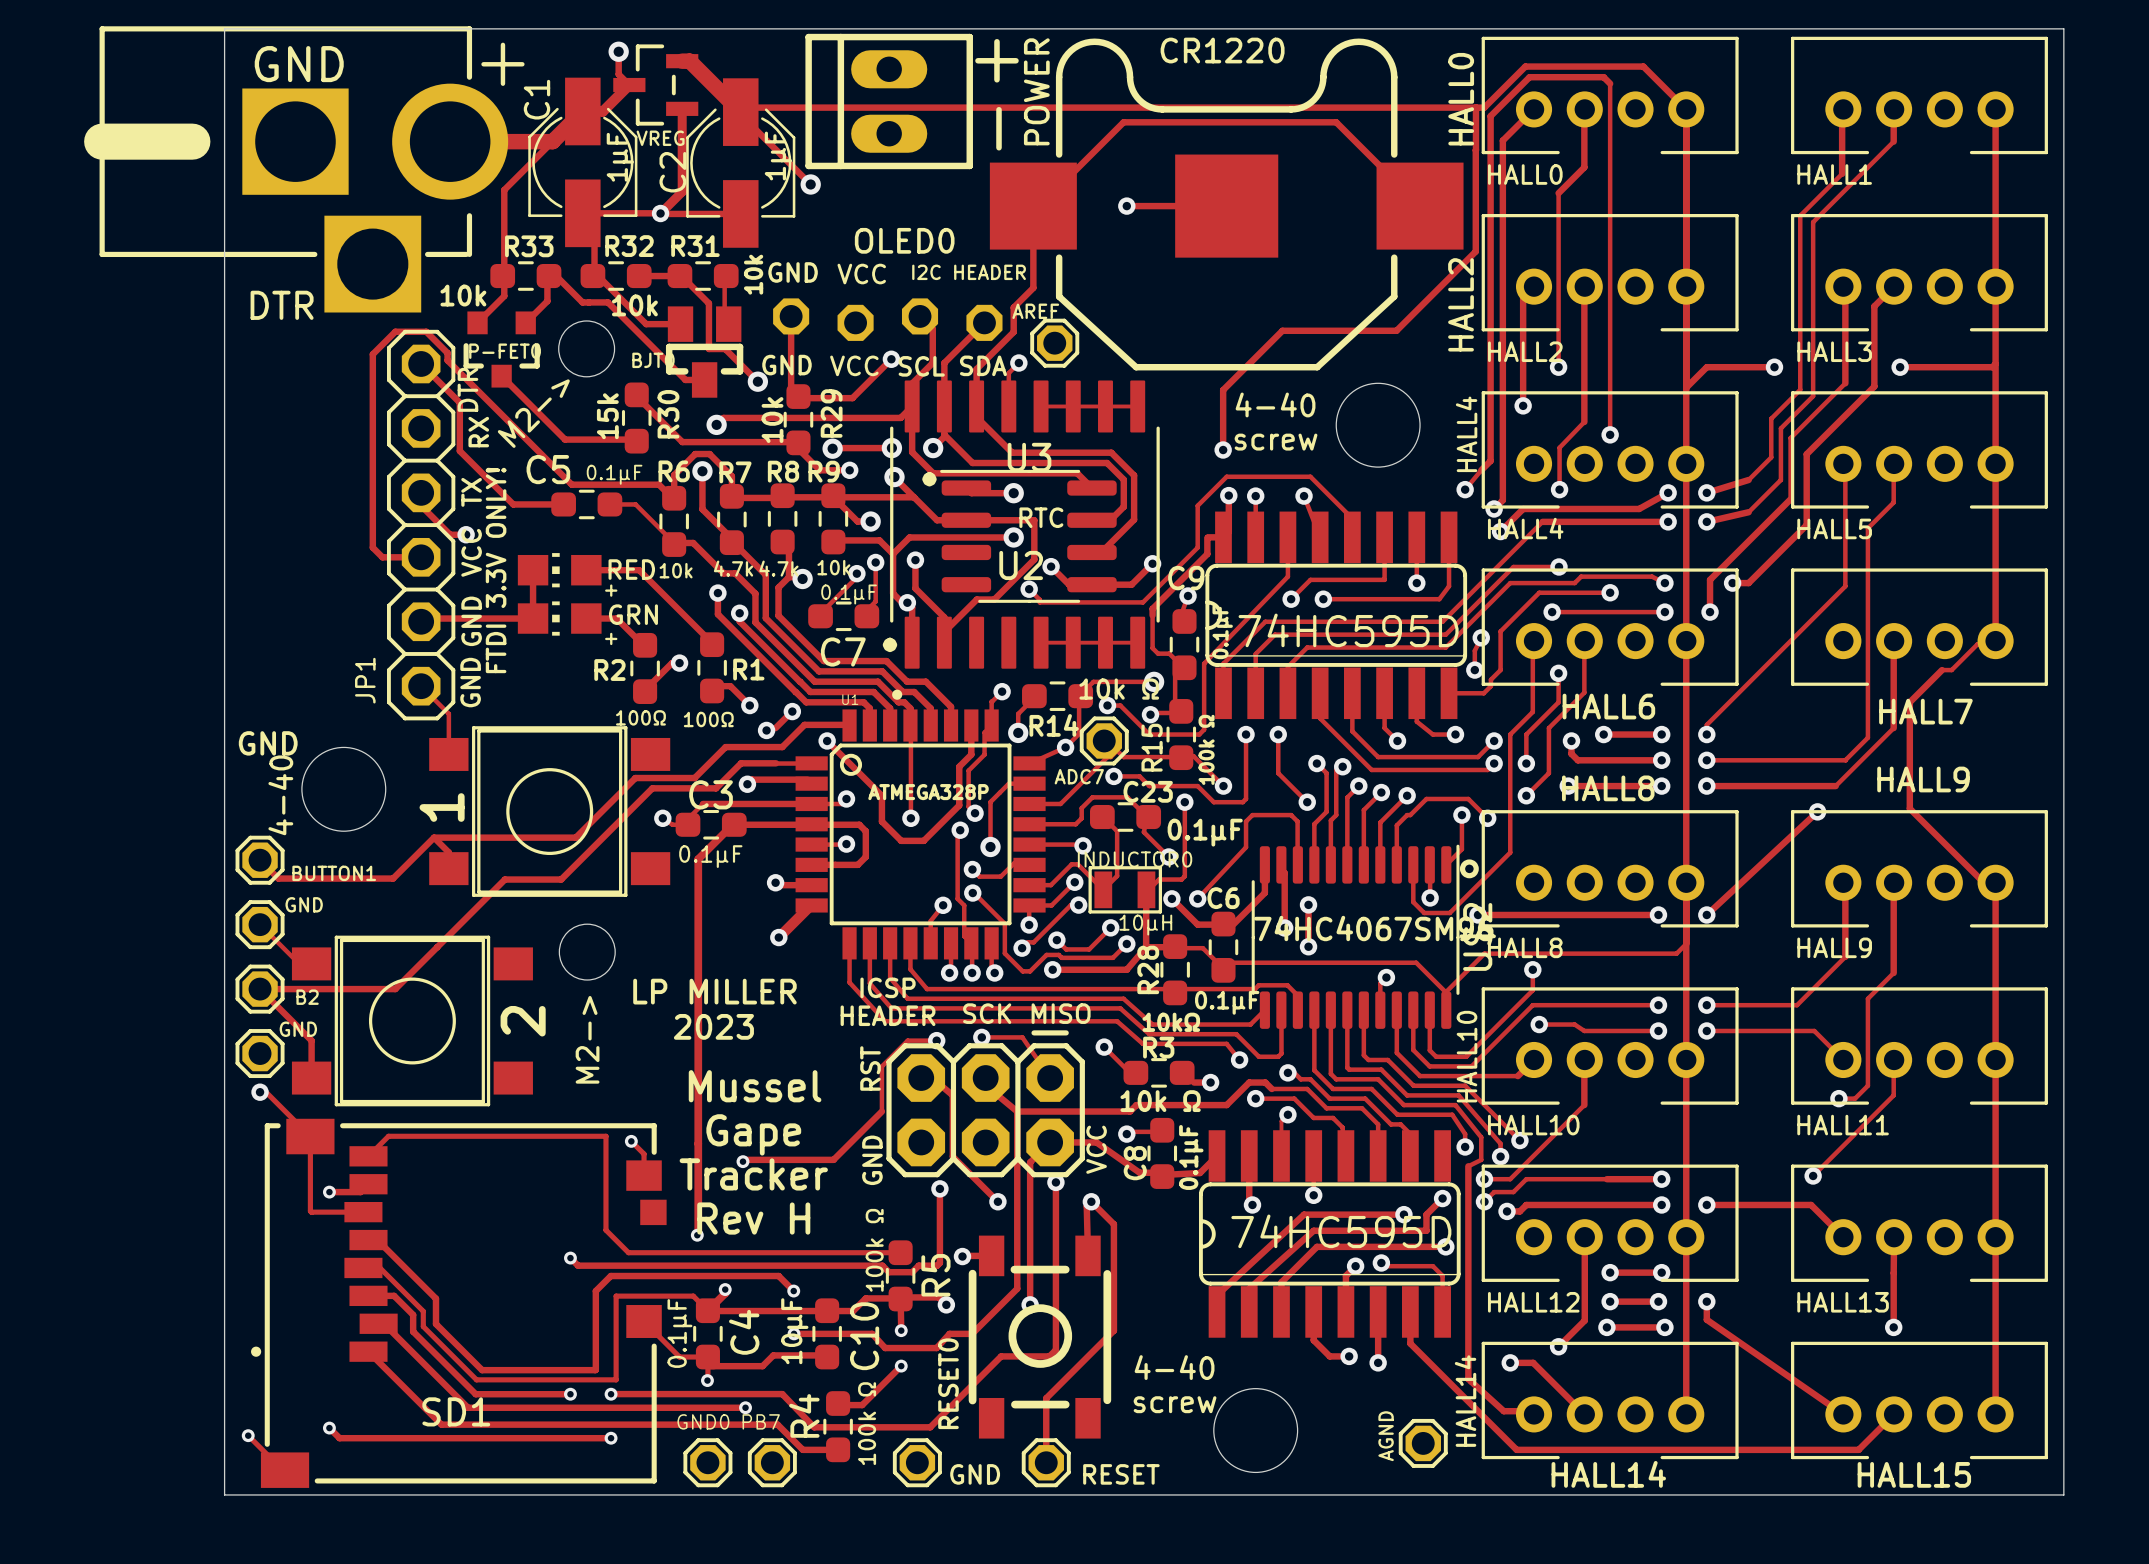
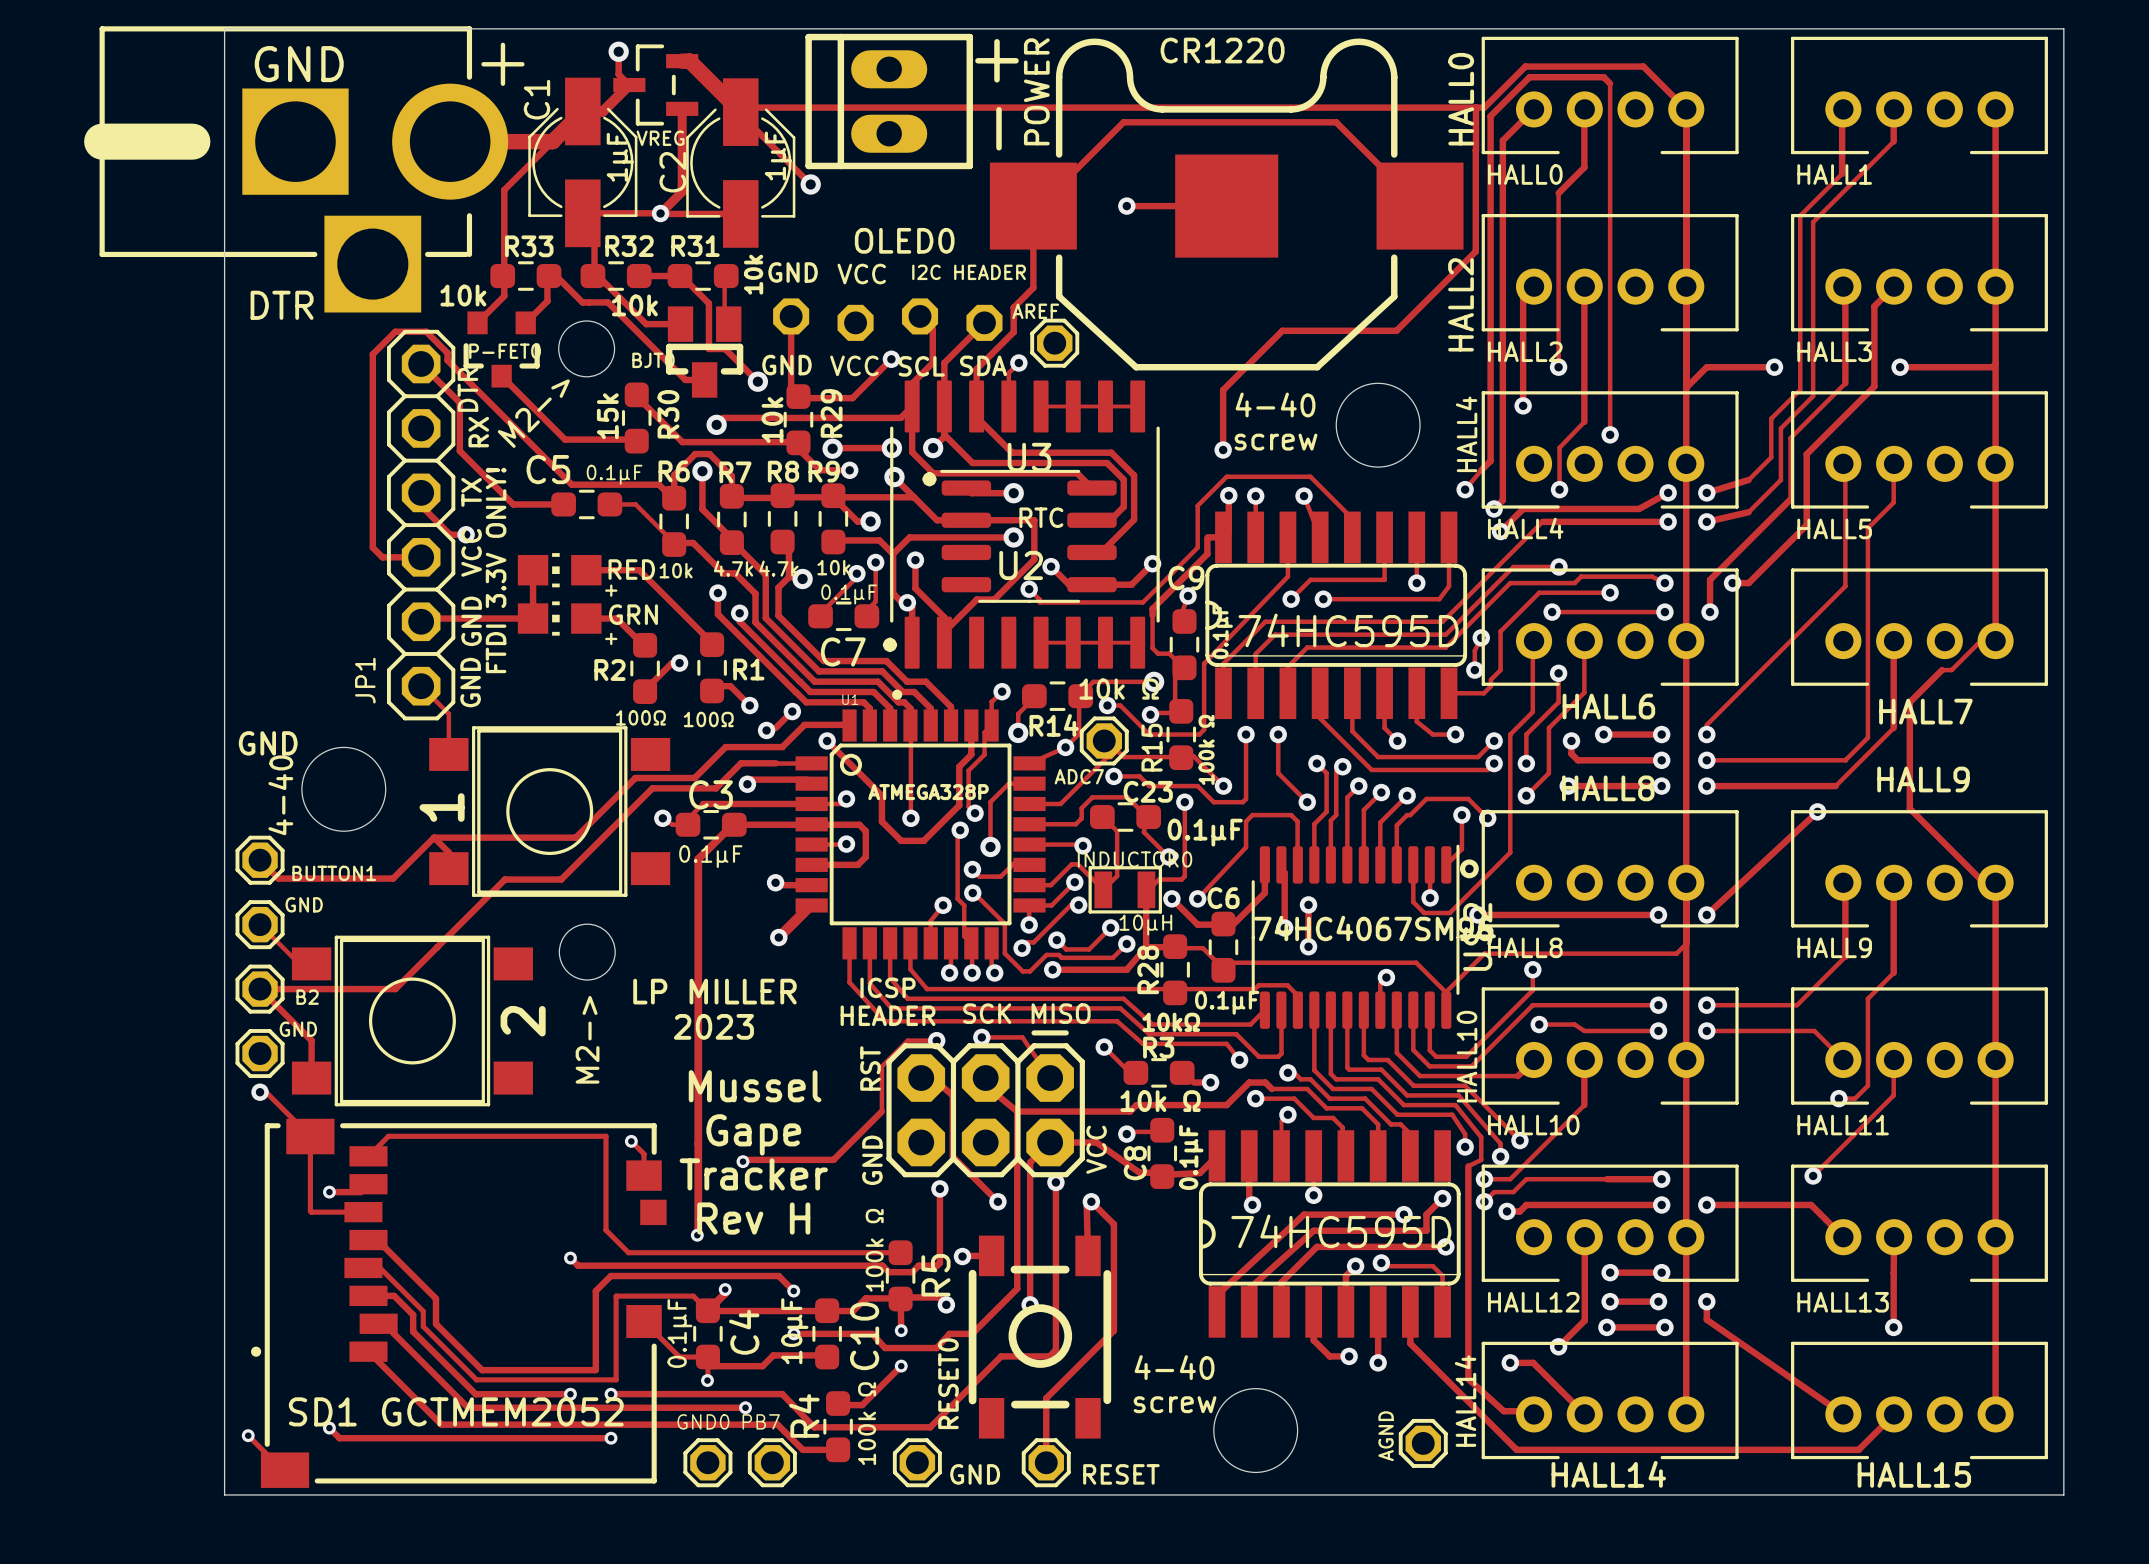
SD1 name: SD1 (456, 1411) -> SD1 GCTMEM2052 (456, 1411)

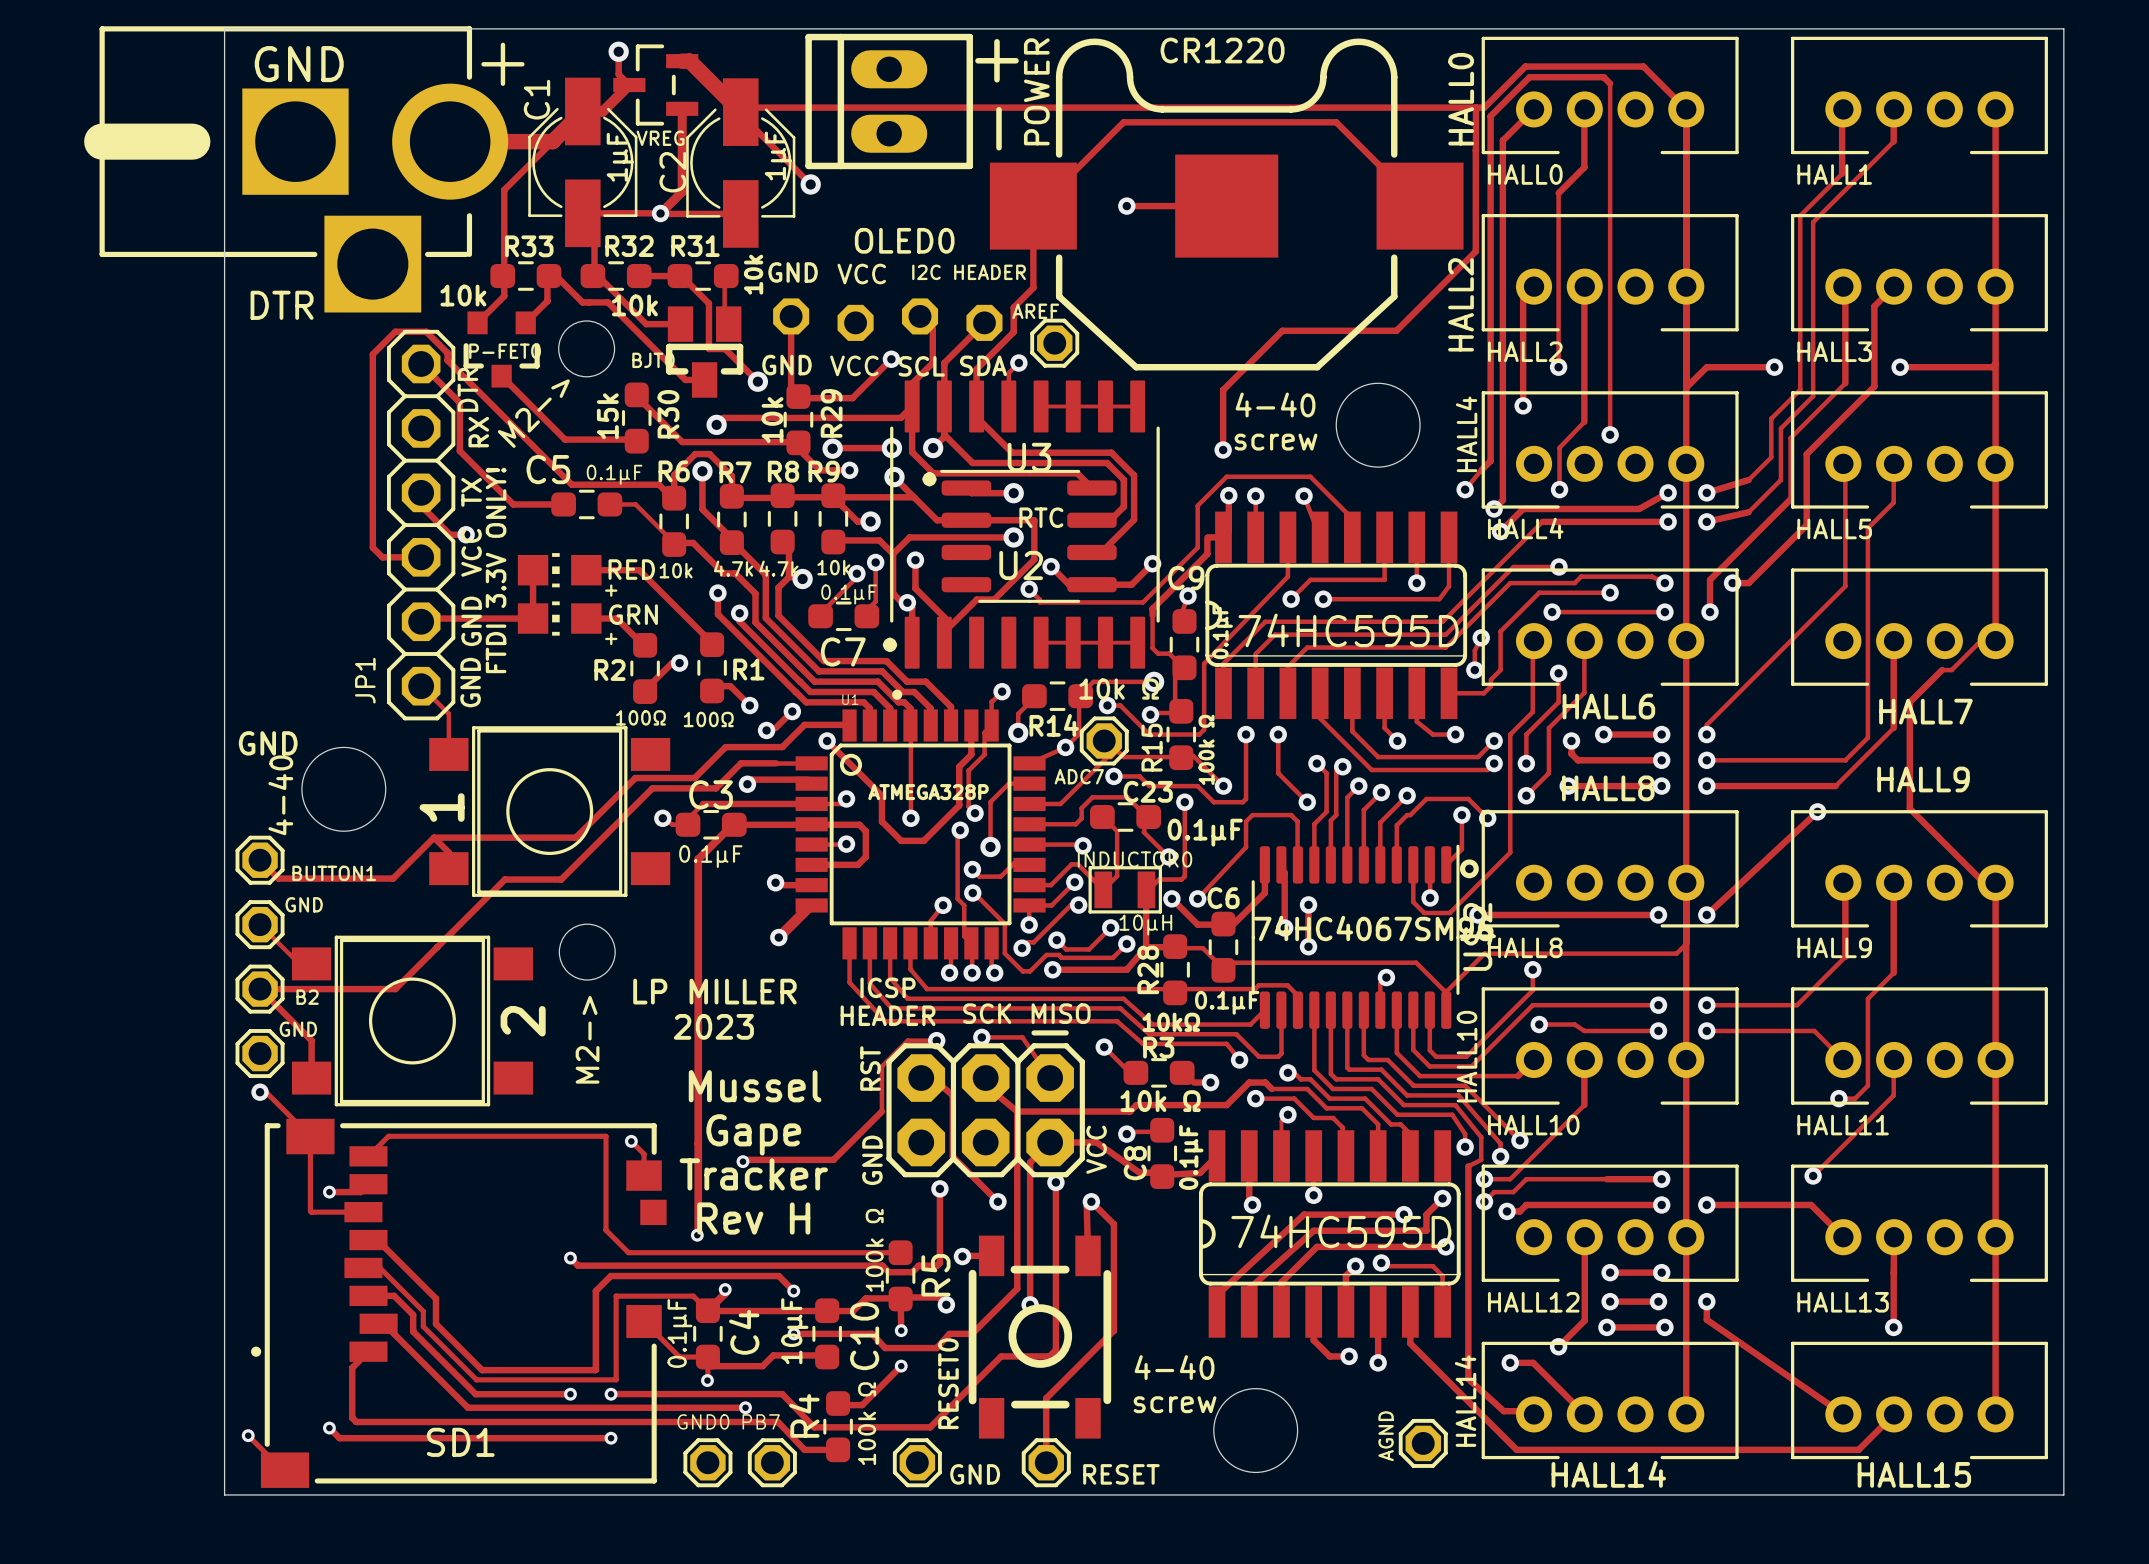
track: (368, 1351) (441, 1424) (777, 1424) (804, 1449) -> (368, 1351) (352, 1367) (352, 1417) (356, 1422) (778, 1422) (804, 1449)
SD1 GCTMEM2052 name: SD1 GCTMEM2052 (456, 1411) -> SD1 (460, 1442)

